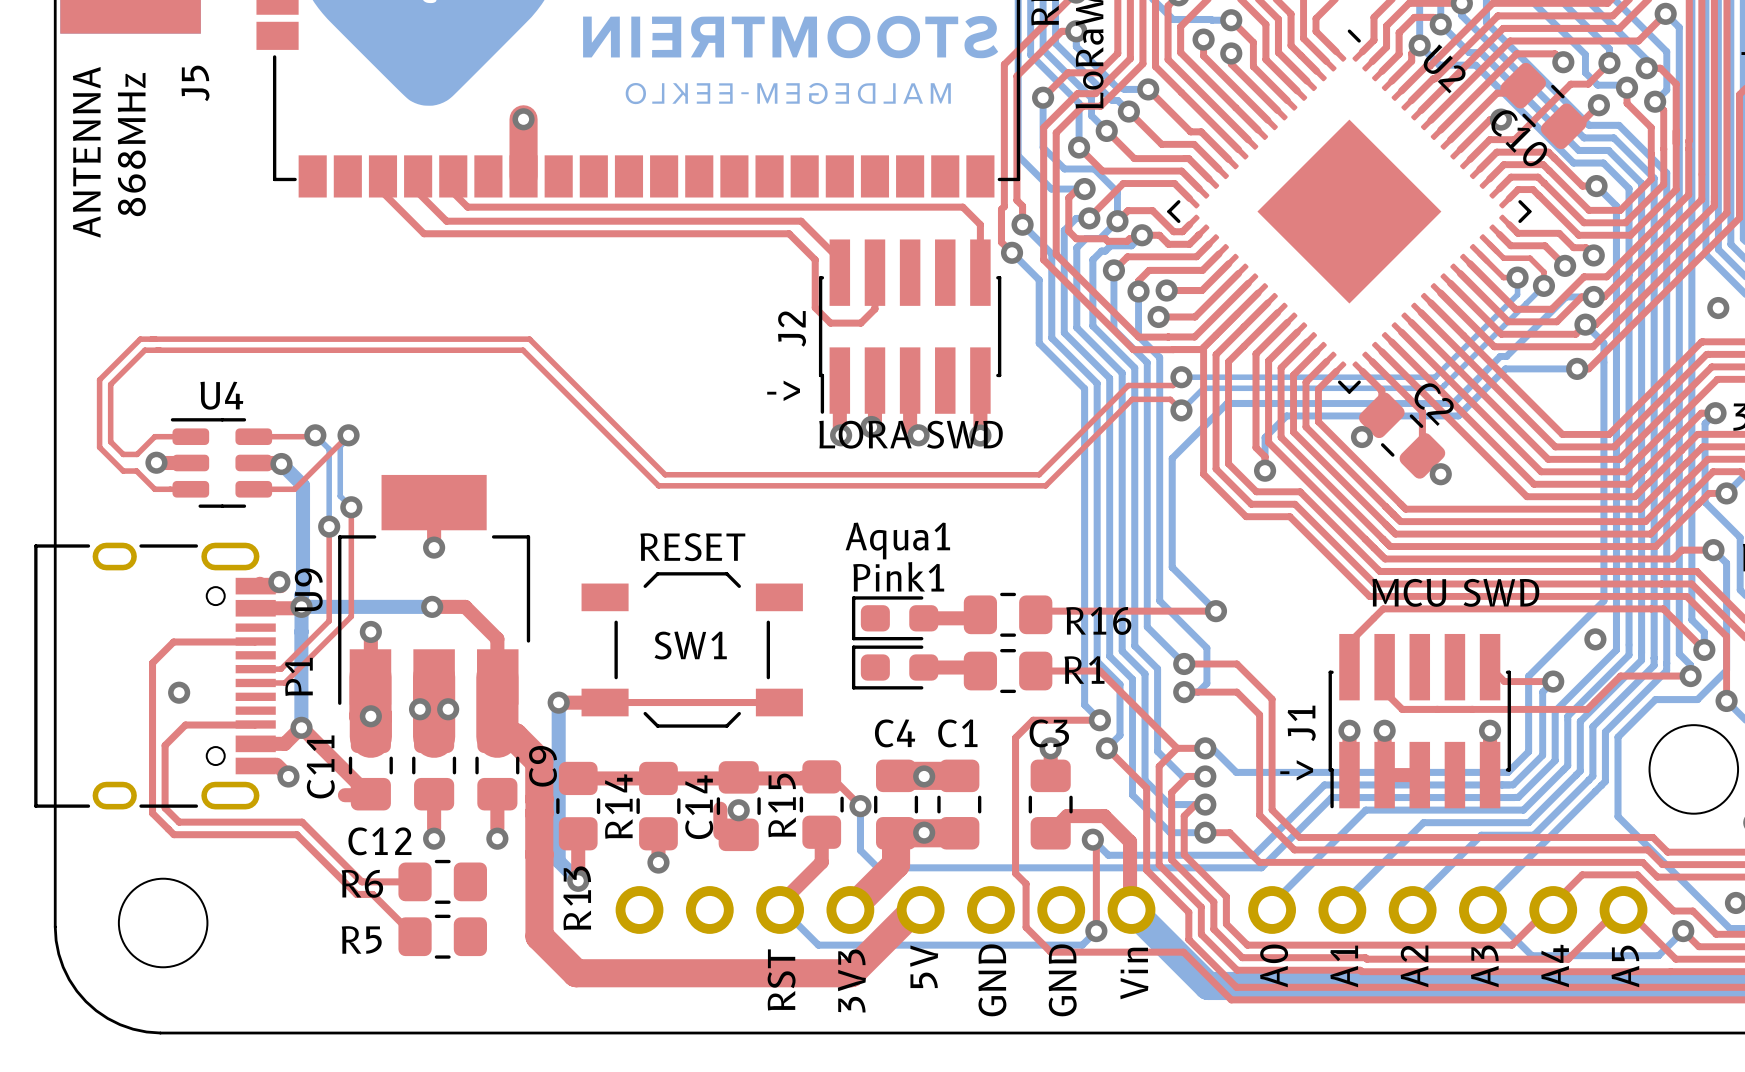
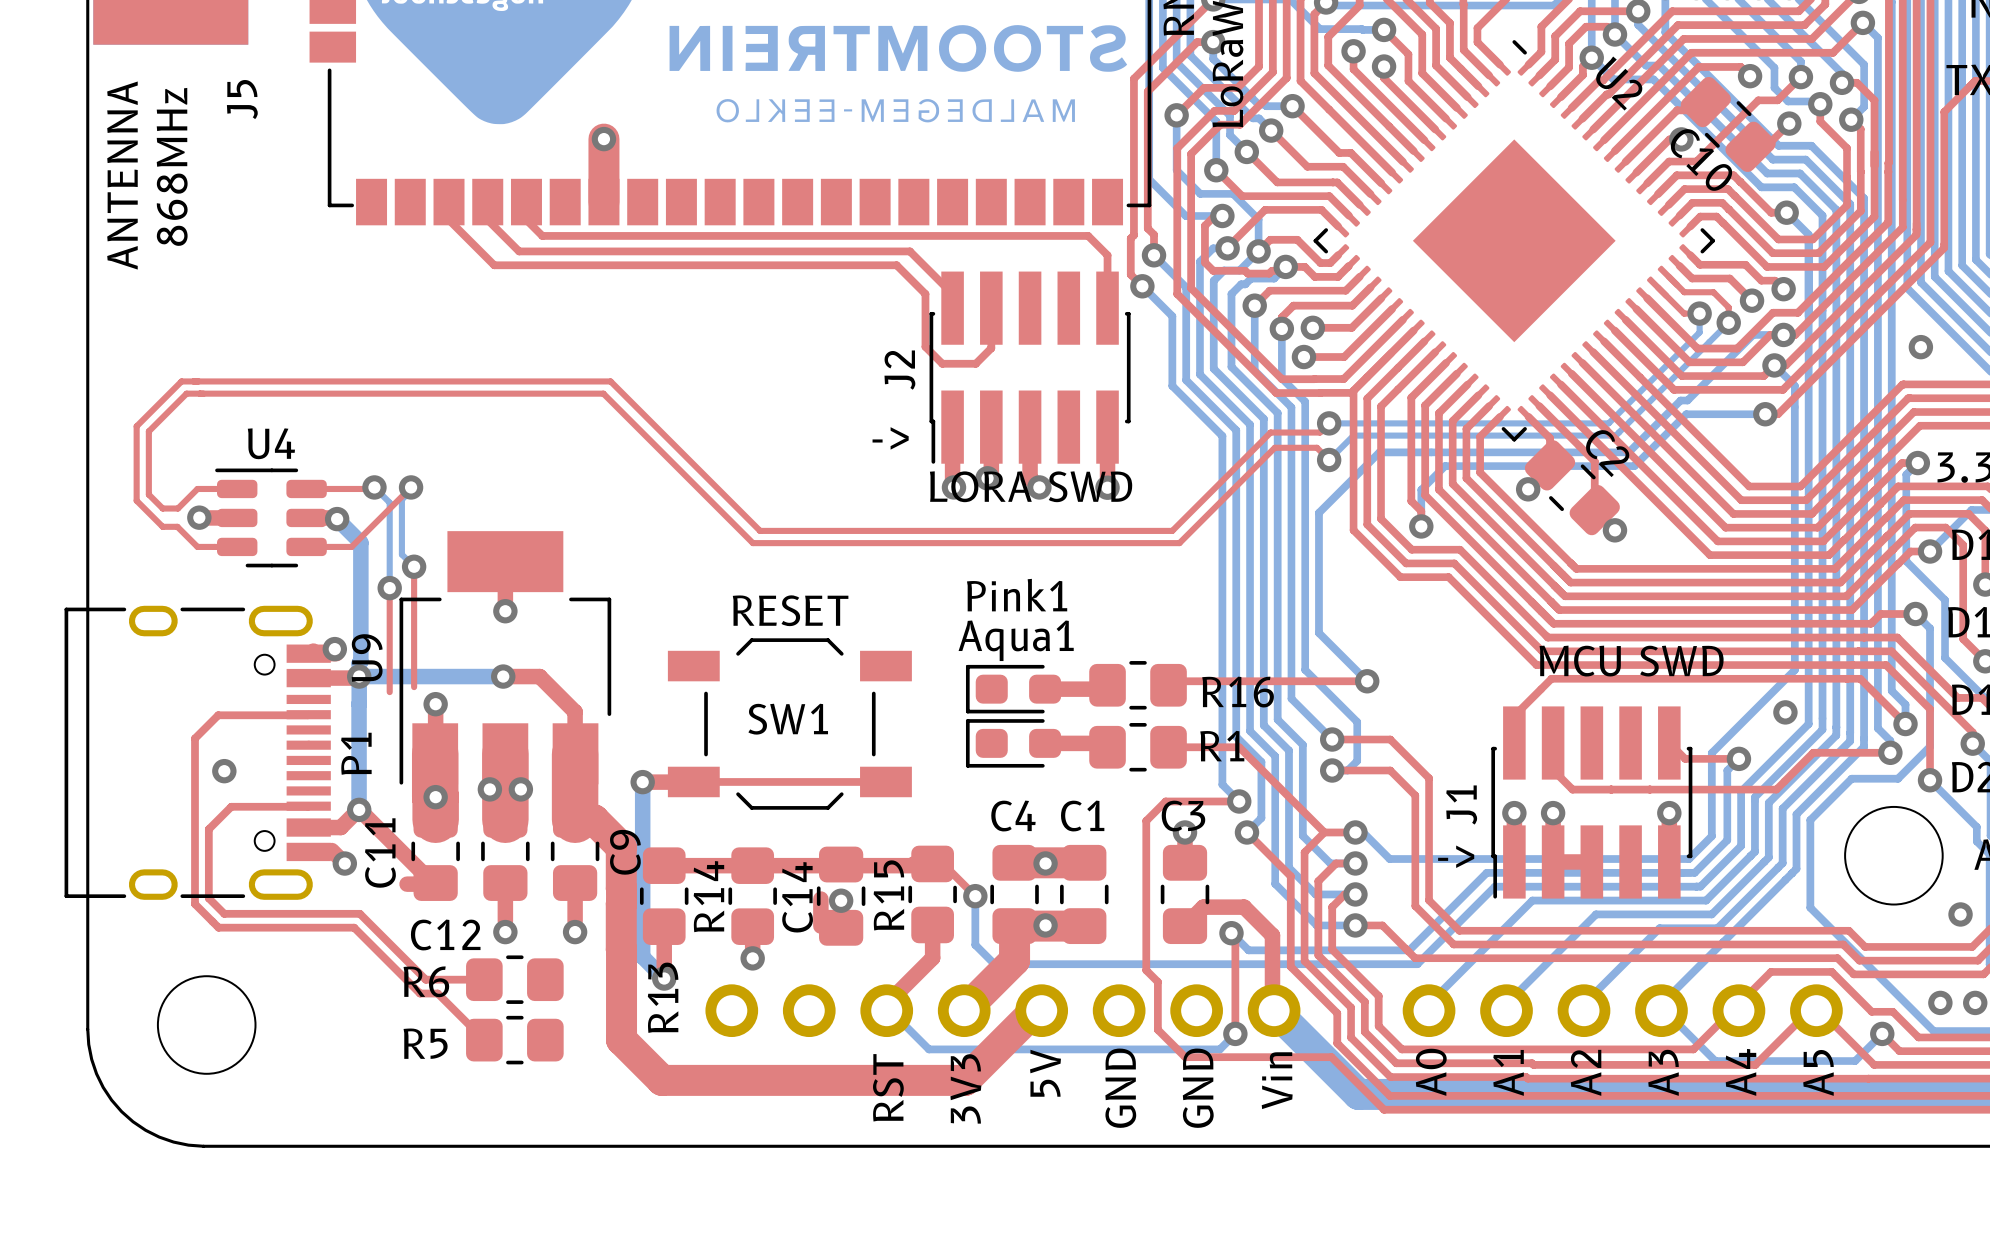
Aqua1 name position: Aqua1 (897, 541) -> Aqua1 (1016, 640)
Pink1 name position: Pink1 (898, 576) -> Pink1 (1017, 595)
top track: (351, 616) (284, 682) (255, 682) -> none
top track: (329, 620) (281, 669) (257, 669) -> none

